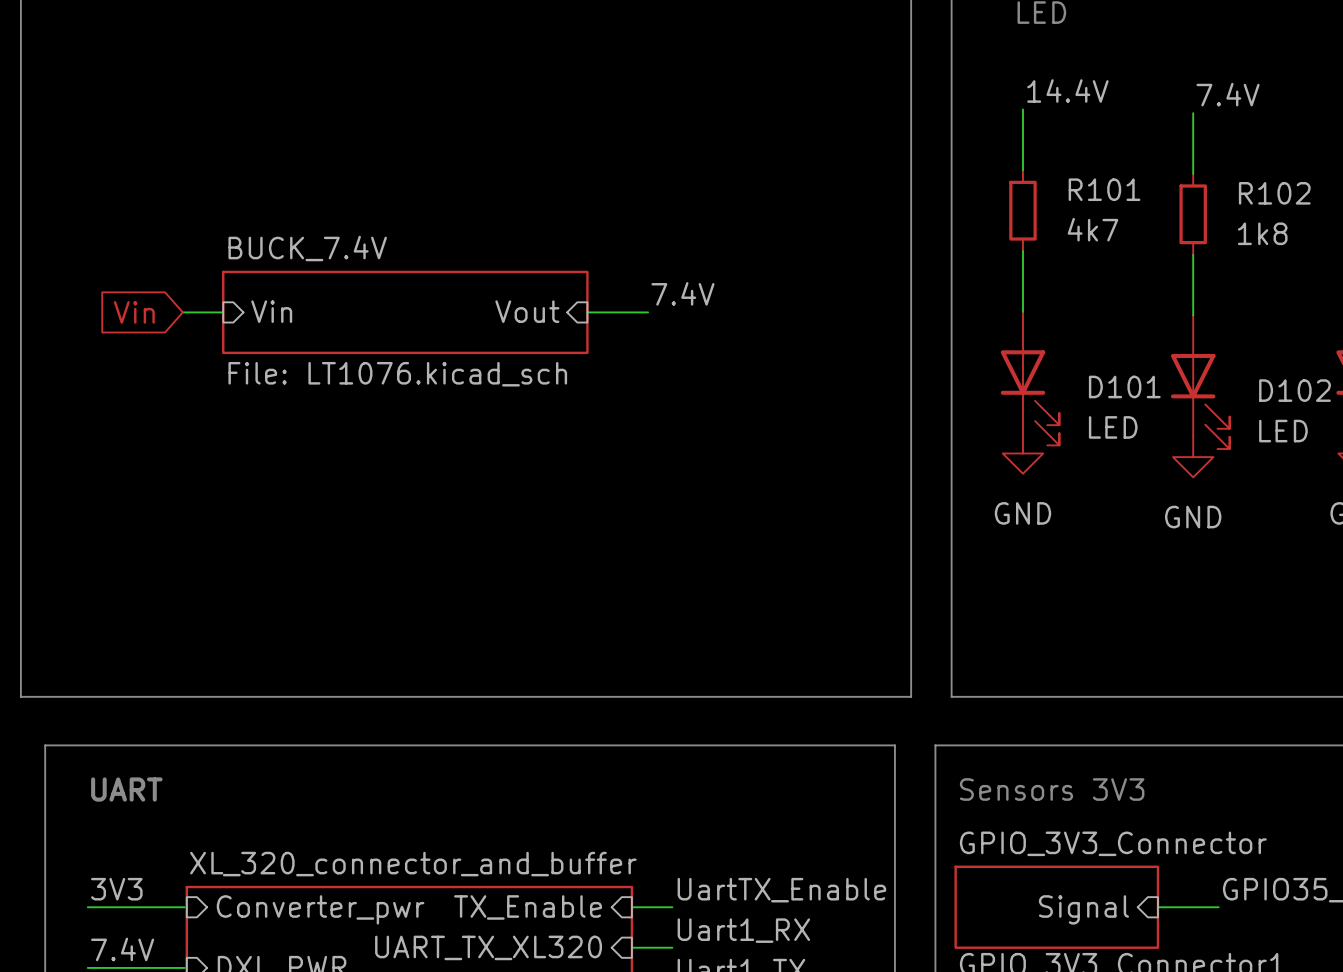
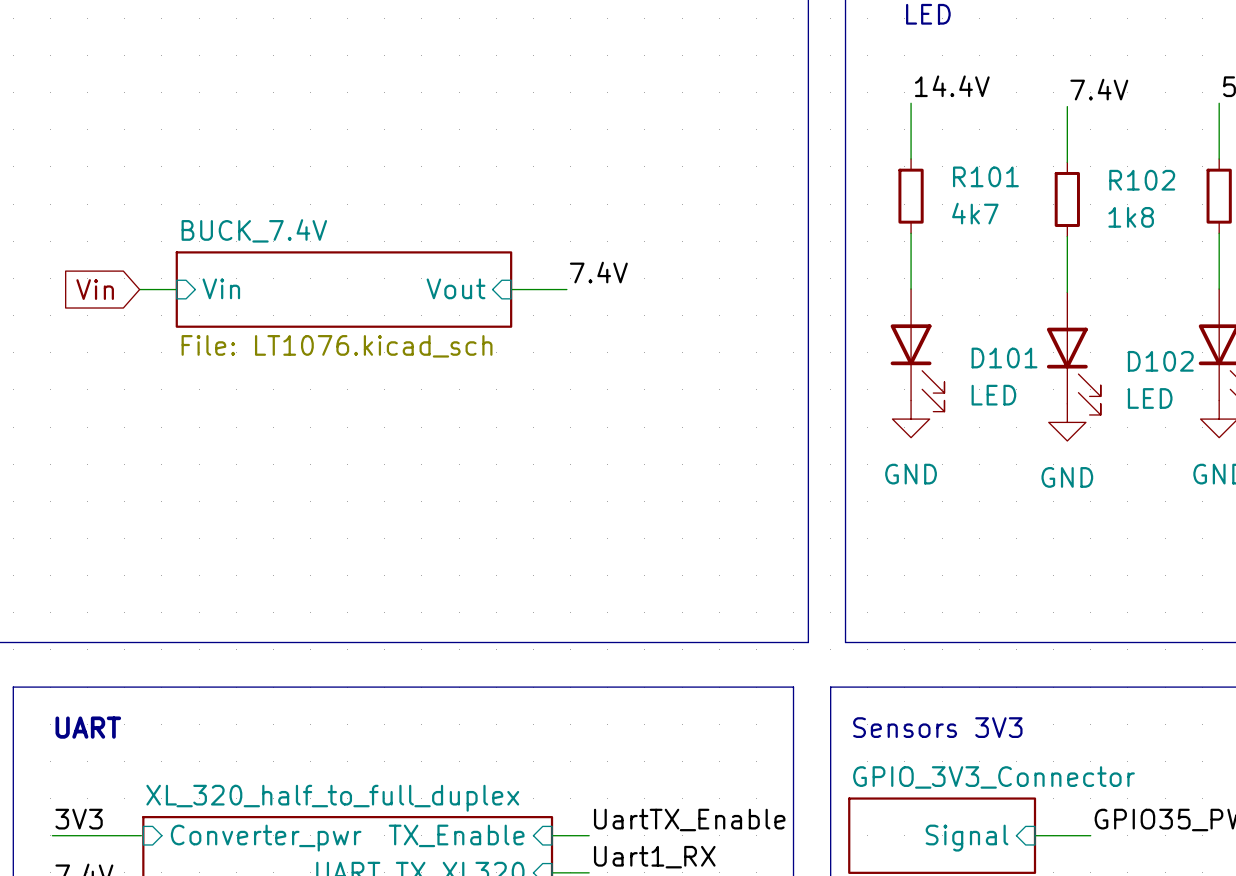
sheet XL_320_connector_and_buffer name: XL_320_connector_and_buffer (413, 864) -> XL_320_half_to_full_duplex (332, 798)

